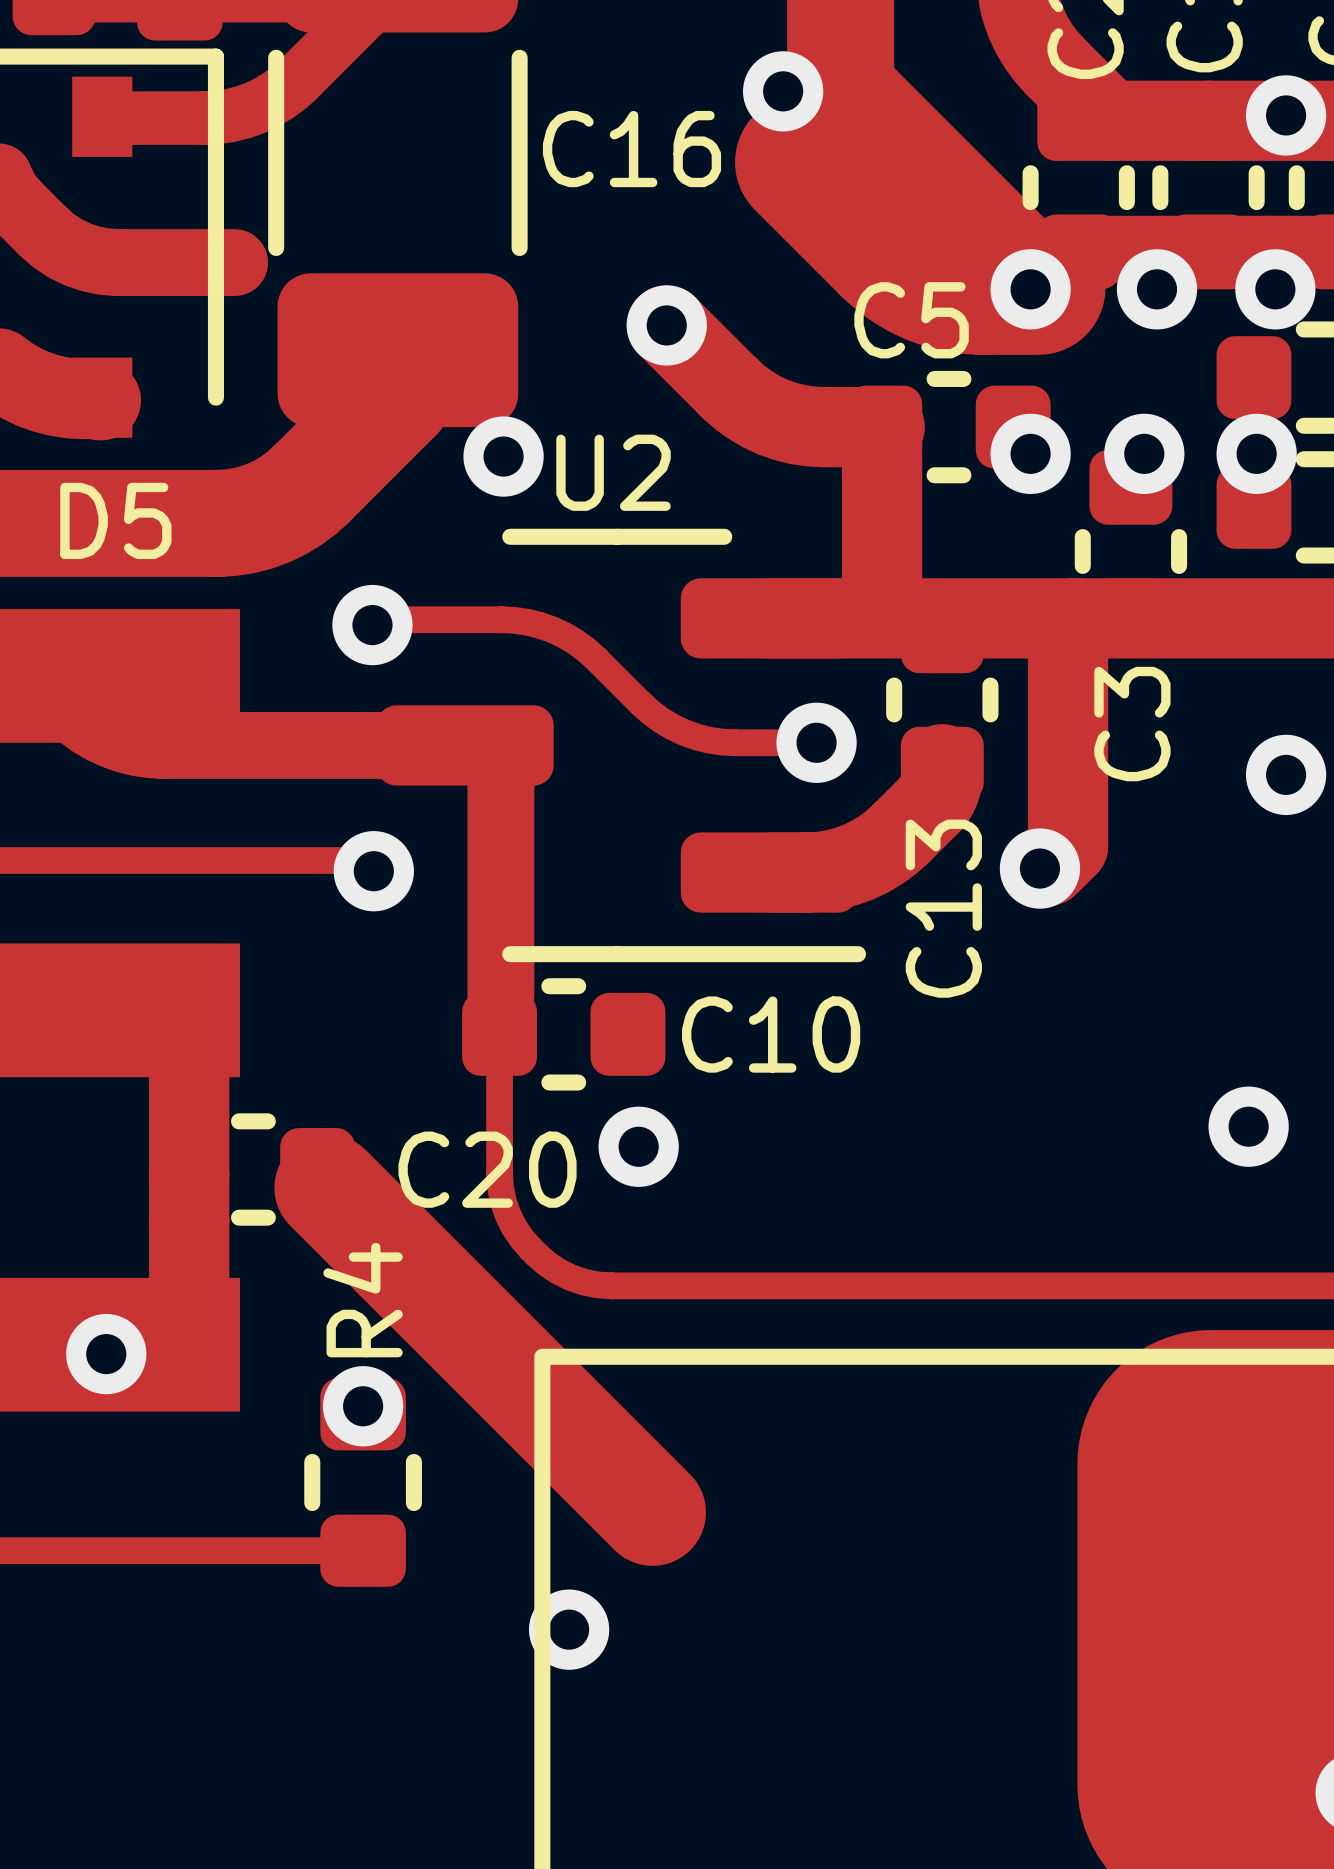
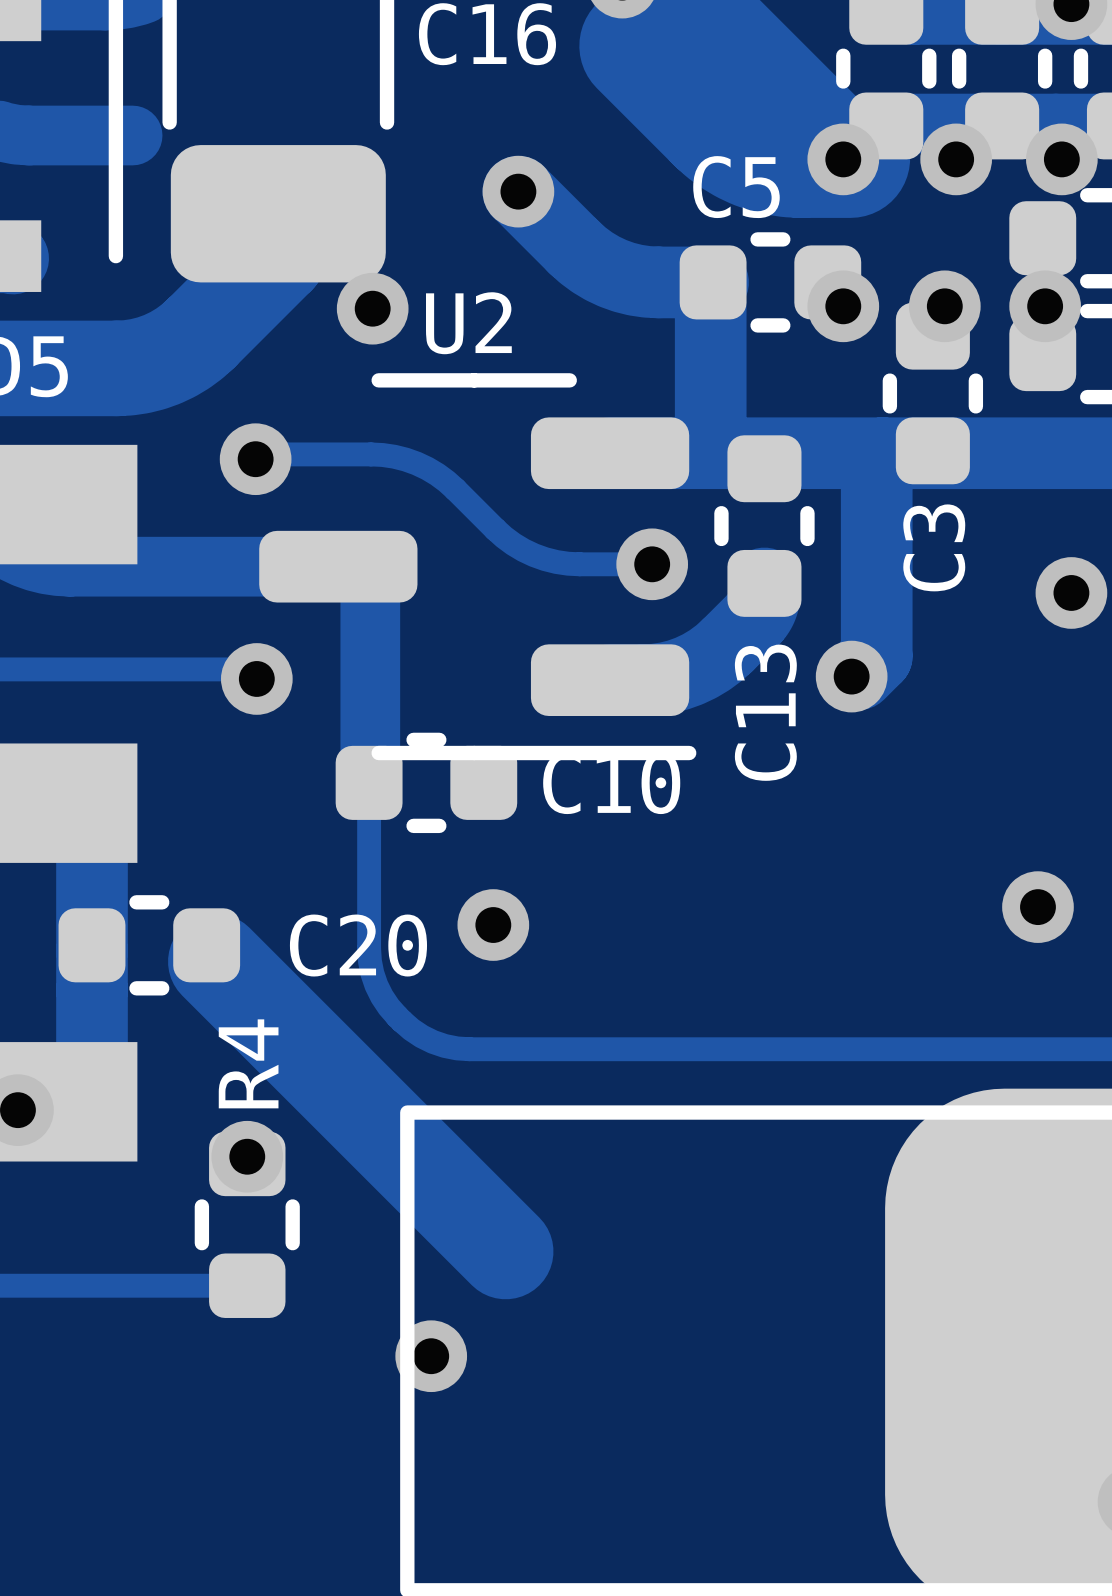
C10 position: (563, 1034) -> (426, 782)

